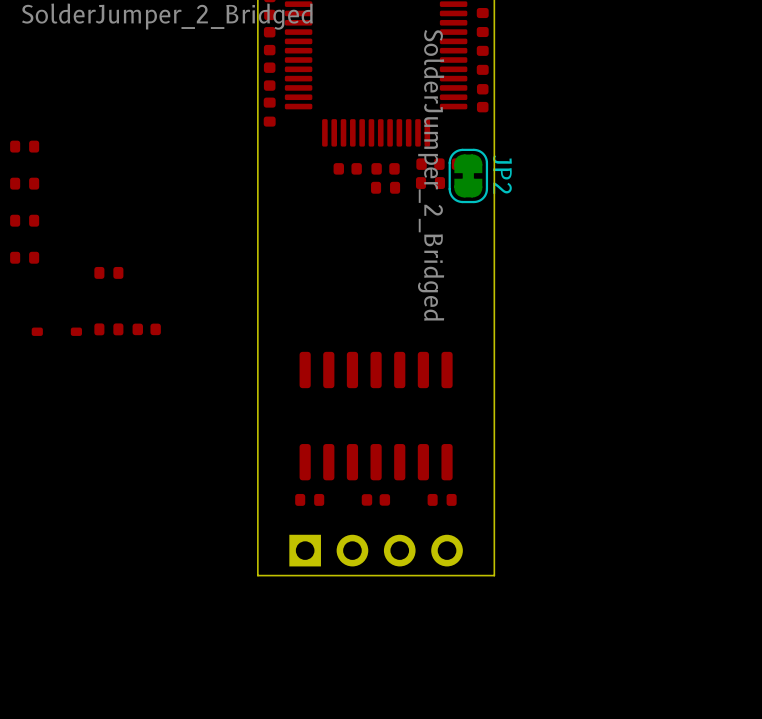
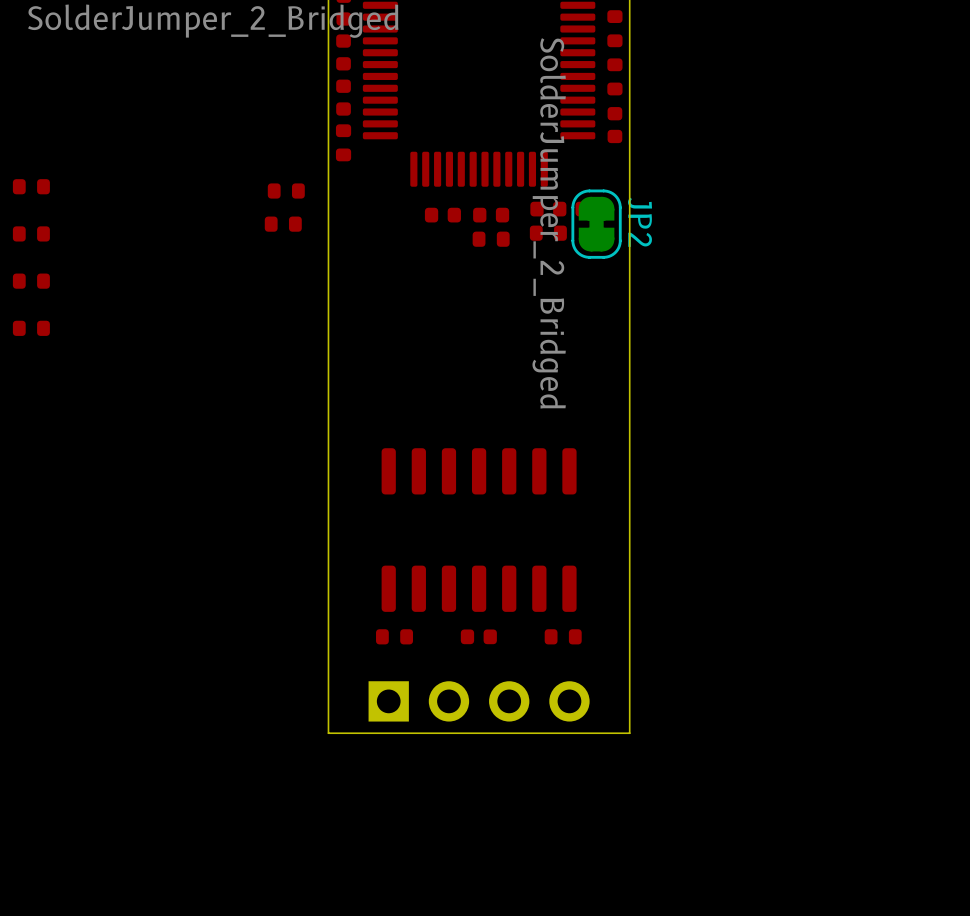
part: none -> (286, 191)
part: none -> (283, 224)
part: (108, 272) -> none
part: (108, 329) -> none
part: (146, 329) -> none
part: (56, 331) -> none

